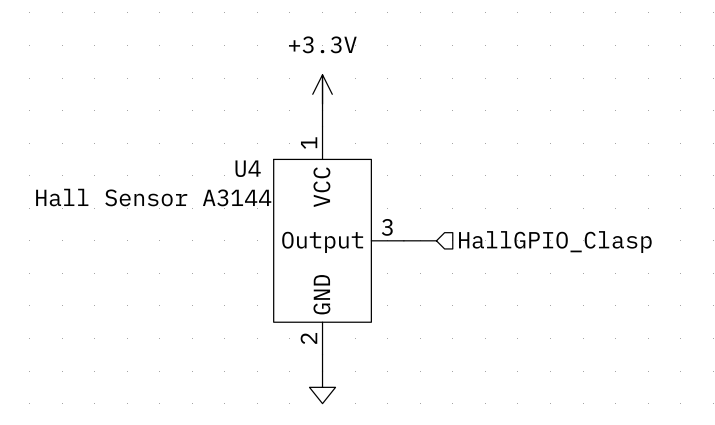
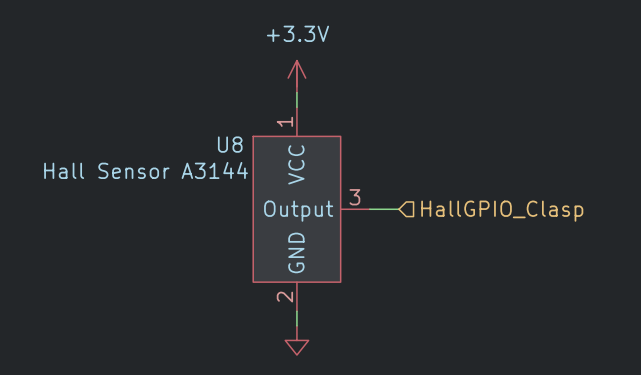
U4 name: U4 (248, 168) -> U8 (230, 144)

